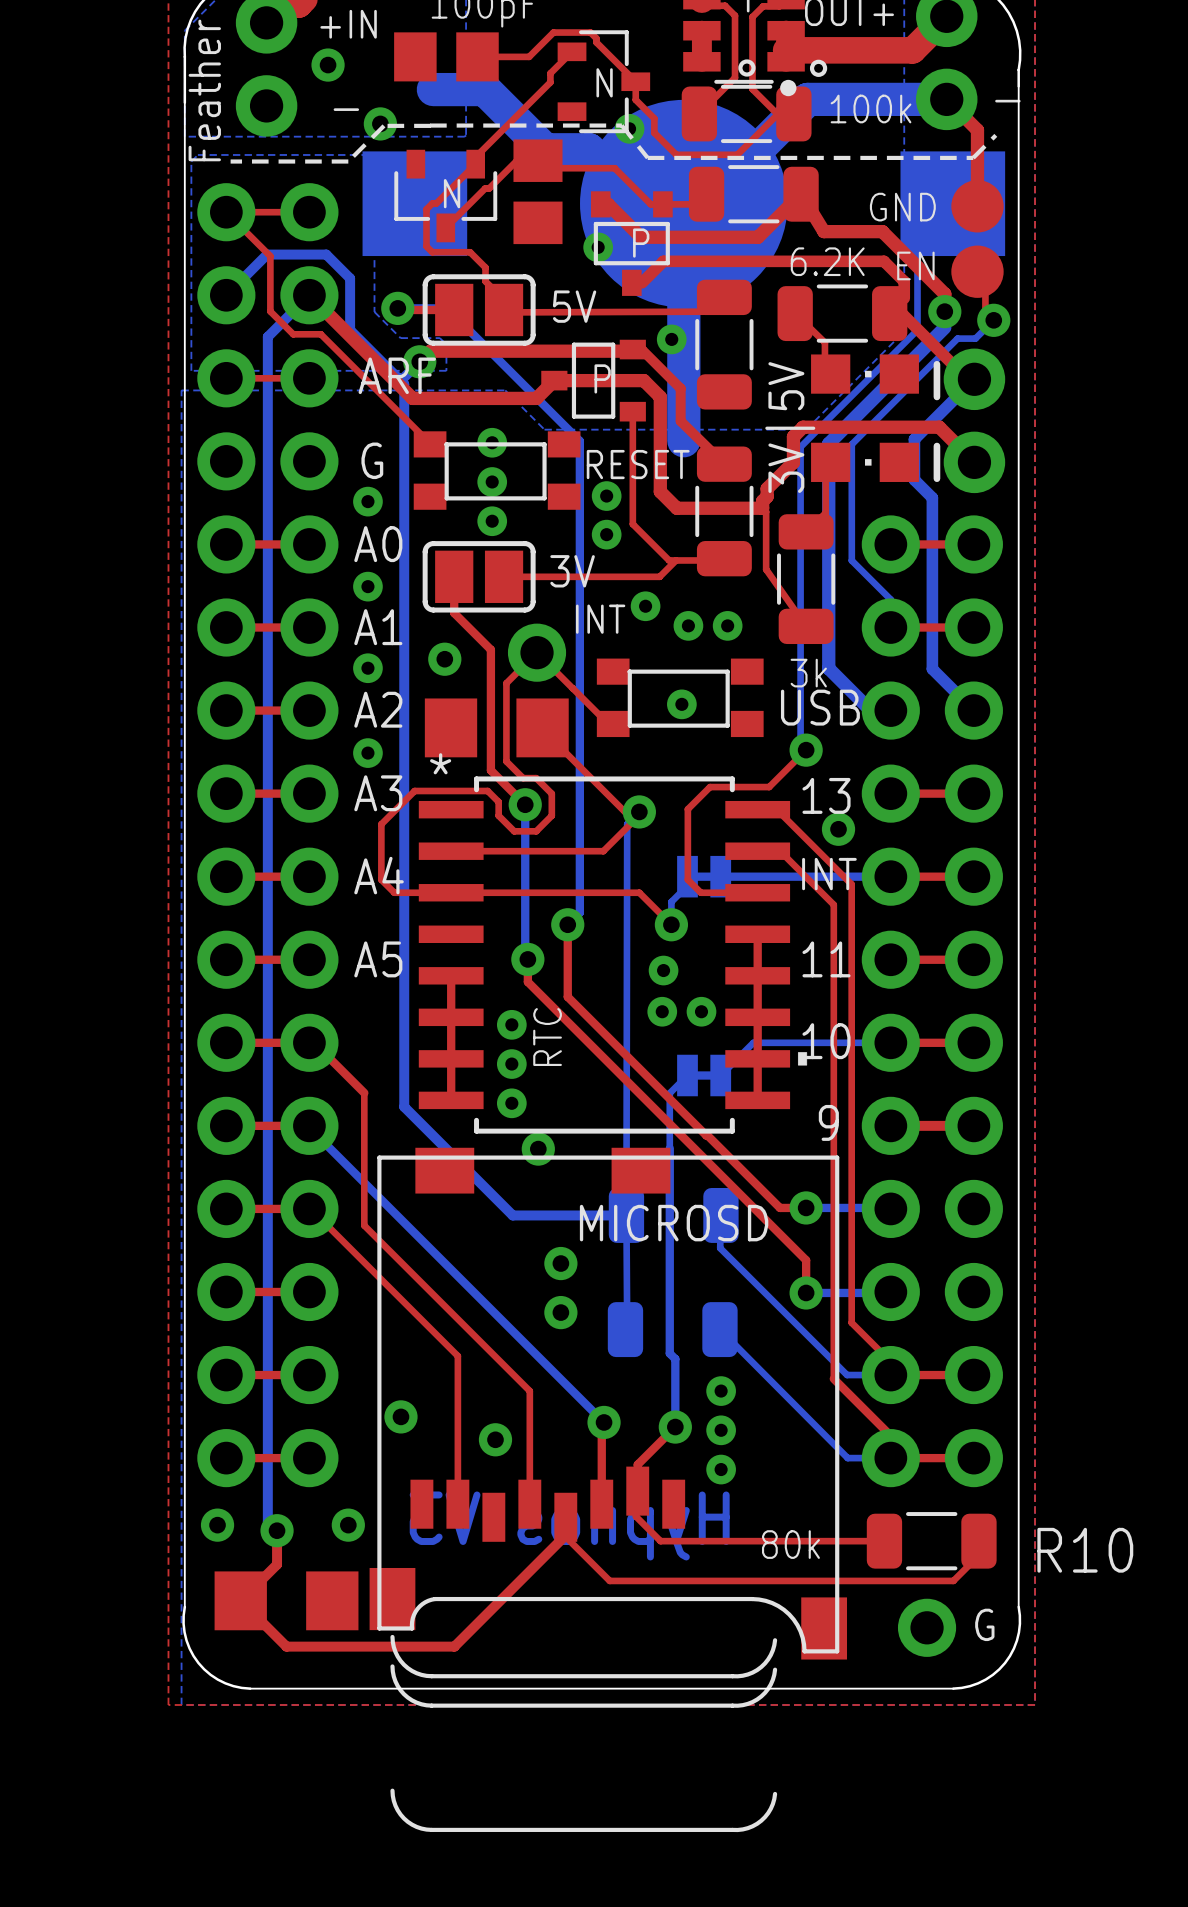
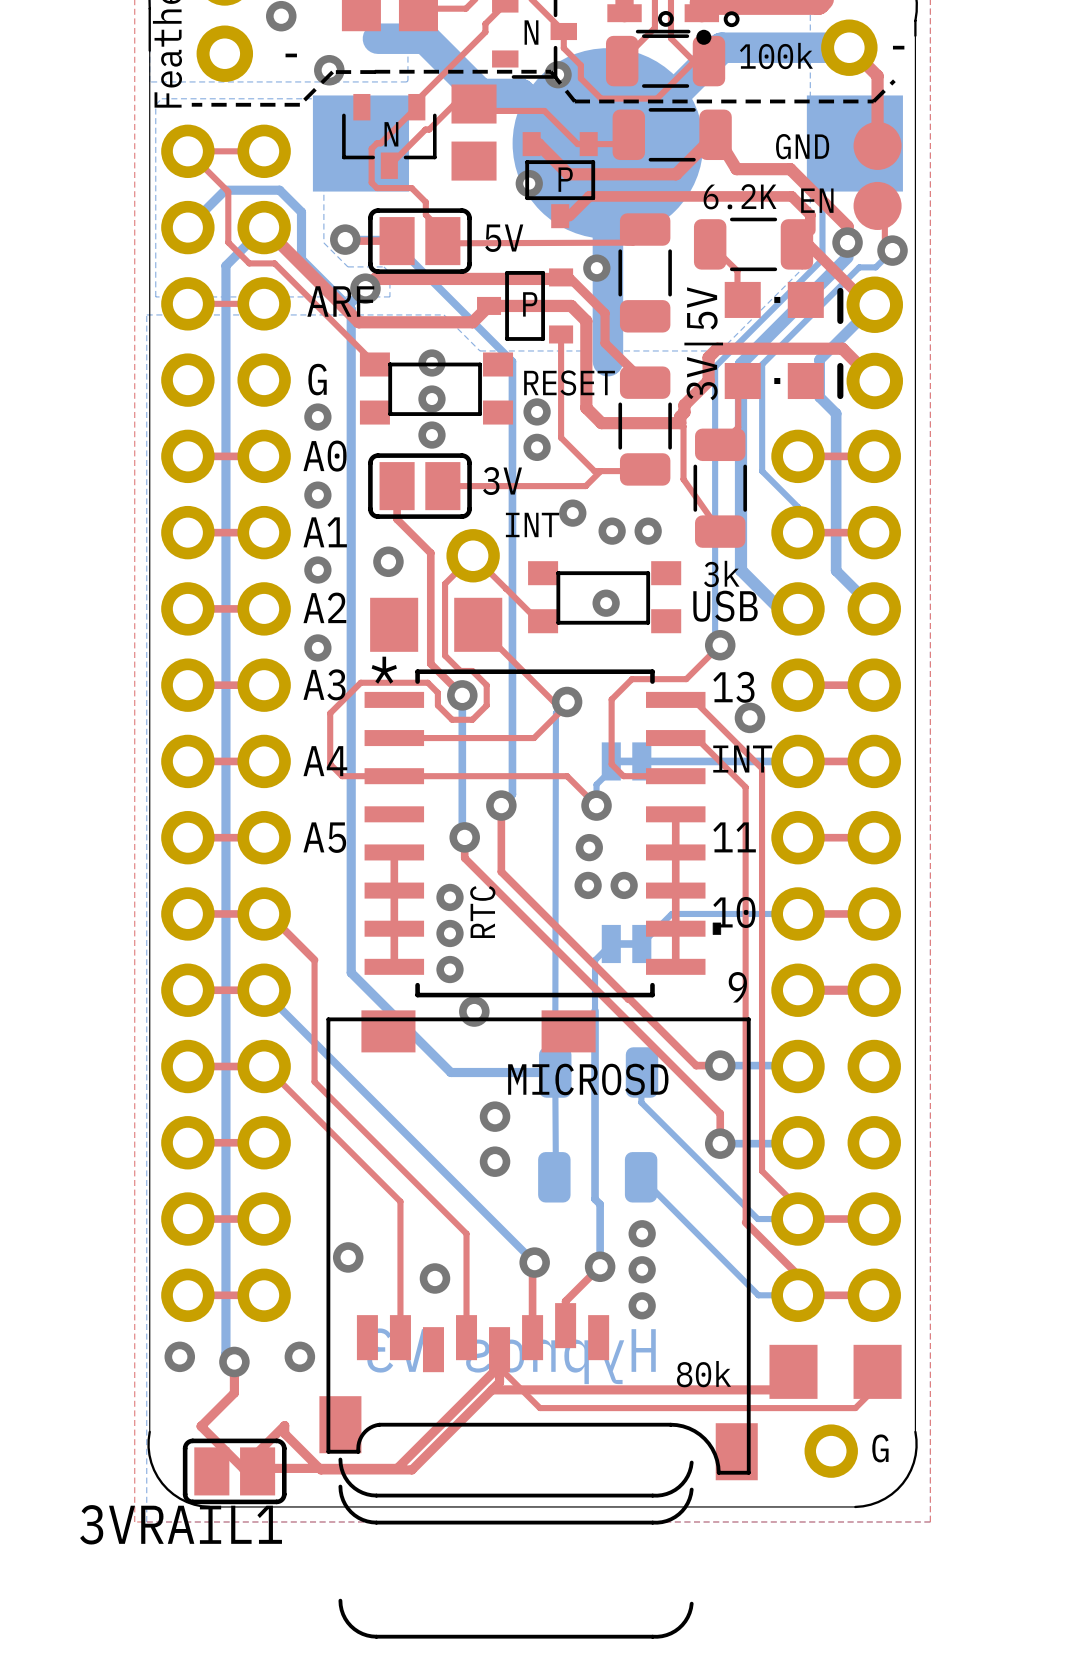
top track: (635, 1492) (635, 1516) (660, 1541) (884, 1541) -> none
top track: none -> (499, 1349) (499, 1382) (412, 1469) (320, 1469) (284, 1433) (284, 1425) (257, 1452) (257, 1471)
top track: none -> (793, 1371) (775, 1389) (492, 1389)
R10: (931, 1541) -> none
part position: (286, 1600) -> (835, 1371)
3VRAIL1: none -> (234, 1471)

